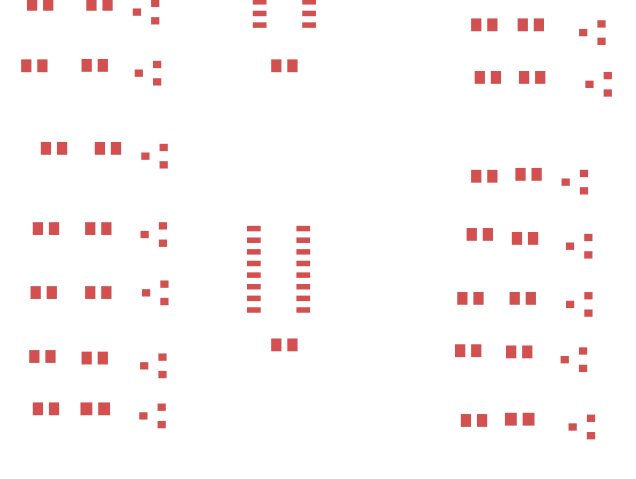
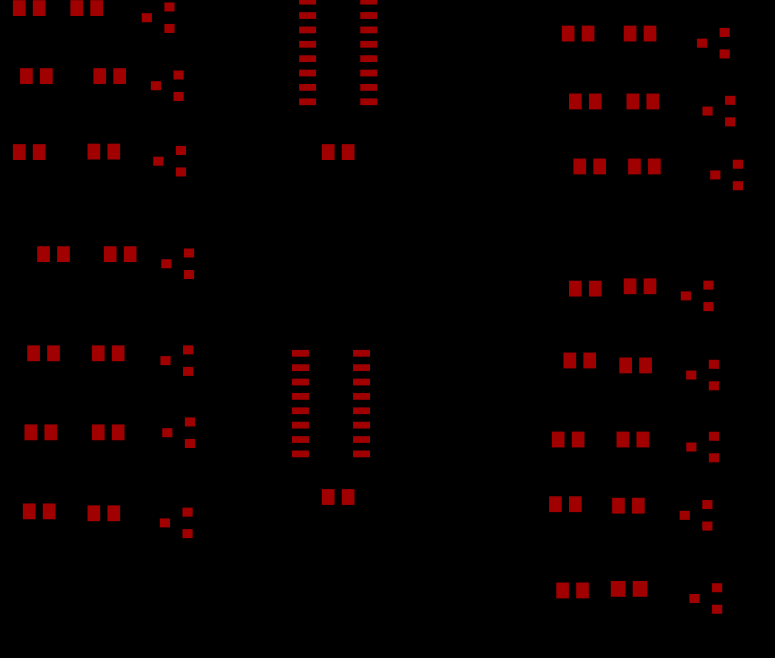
part: (45, 408) -> none
part: (95, 408) -> none
part: (152, 415) -> none

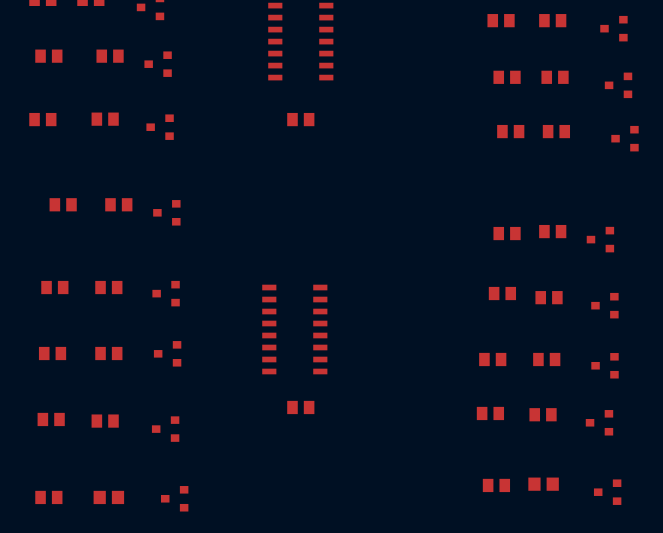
part: none -> (48, 497)
part: none -> (108, 497)
part: none -> (174, 498)

